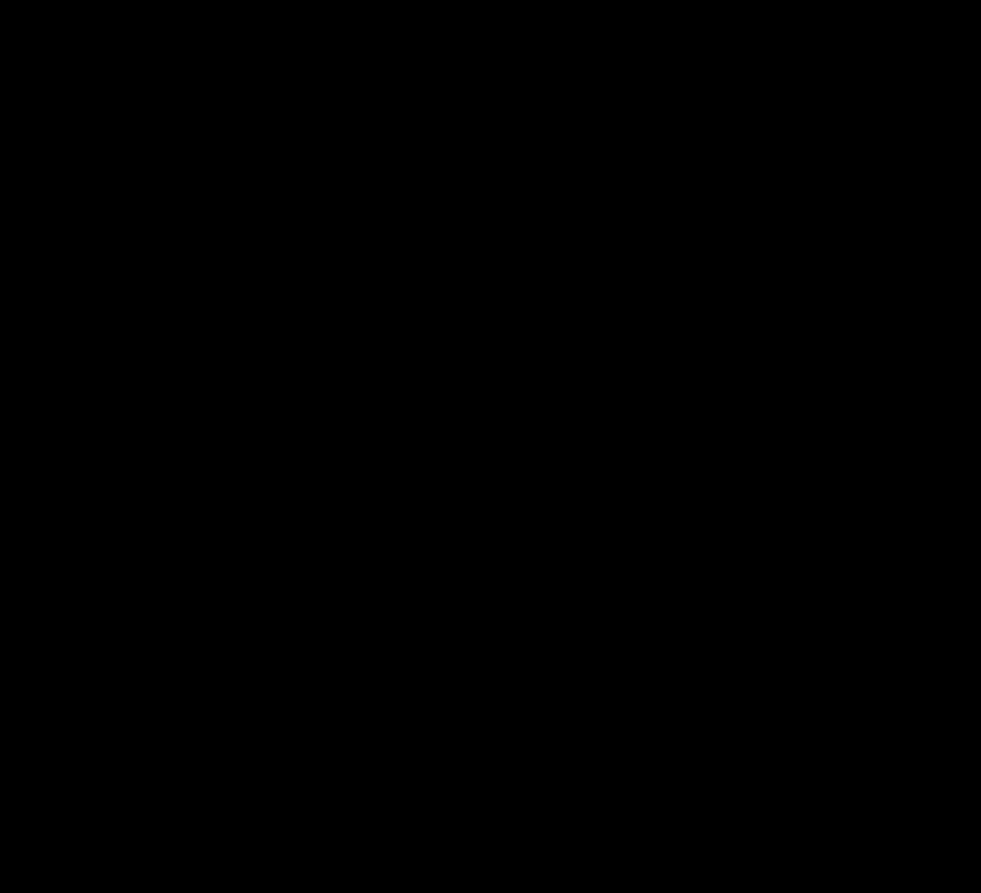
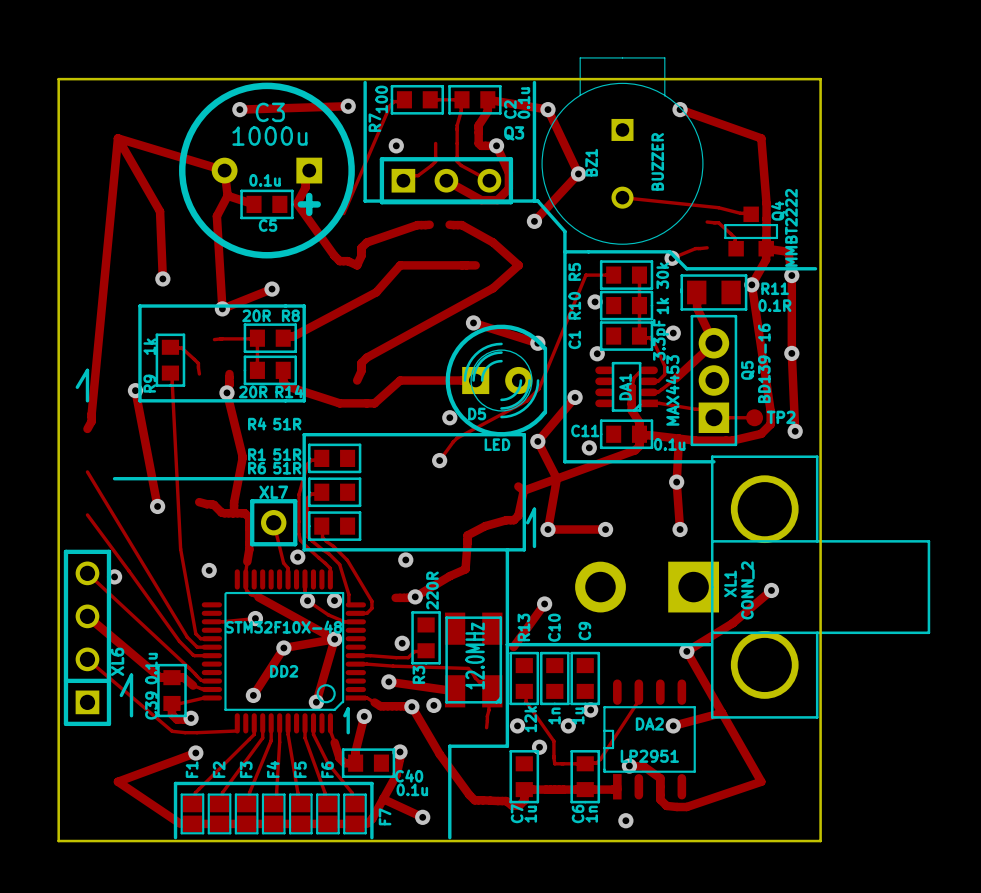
board edge: none -> (58, 79) (820, 79) (820, 841) (58, 841) (58, 79)
line: none -> (365, 82) (365, 201) (537, 201) (564, 231) (564, 461) (713, 461)
line: none -> (534, 82) (534, 201)
track: none -> (404, 99) (394, 101) (390, 105) (343, 213)
R7: none -> 100 (417, 99)
track: none -> (430, 99) (462, 99) (457, 125) (457, 161) (489, 180)
C2: none -> 0.1u (474, 99)
track: none -> (348, 106) (239, 109)
via: none -> (348, 106)
via: none -> (239, 109)
via: none -> (548, 109)
track: none -> (680, 109) (761, 138) (766, 203) (766, 259) (751, 284) (770, 411) (770, 424) (761, 433) (732, 440) (679, 438)
via: none -> (680, 109)
track: none -> (117, 138) (160, 211) (162, 278)
track: none -> (117, 138) (224, 170) (227, 195)
track: none -> (117, 138) (91, 421) (87, 428)
track: none -> (435, 143) (435, 161) (418, 175) (403, 180)
via: none -> (396, 145)
via: none -> (496, 145)
BZ1: none -> BUZZER (622, 151)
C3: none -> 1000u (266, 170)
track: none -> (309, 170) (305, 179) (305, 187) (297, 203) (339, 261) (347, 261) (357, 265) (361, 256) (361, 247) (366, 242) (417, 225) (429, 224)
via: none -> (578, 173)
track: none -> (446, 180) (481, 200) (497, 200) (508, 188) (508, 172) (496, 145) (481, 145) (478, 143) (478, 125) (487, 111) (487, 99) (548, 109) (578, 173) (534, 221)
Q3: none -> (446, 180)
track: none -> (227, 195) (254, 204)
track: none -> (227, 195) (216, 216) (222, 308) (272, 289)
track: none -> (622, 197) (718, 207) (751, 214)
C5: none -> 0.1u (266, 204)
via: none -> (534, 221)
track: none -> (707, 222) (718, 222) (731, 234) (735, 238) (736, 248)
track: none -> (449, 224) (461, 225) (493, 242) (518, 265) (493, 288) (366, 357) (361, 363) (361, 371) (357, 380)
Q4: none -> MMBT2222 (751, 231)
track: none -> (707, 247) (695, 248) (672, 258)
track: none -> (766, 248) (788, 251) (791, 275) (791, 353) (795, 431)
line: none -> (564, 251) (669, 251) (686, 268) (815, 268)
via: none -> (672, 258)
track: none -> (475, 265) (400, 265) (376, 292) (293, 336) (283, 338)
track: none -> (613, 275) (585, 275) (539, 388) (527, 400) (457, 438) (439, 460)
R5: none -> 30k (626, 275)
track: none -> (639, 275) (639, 336) (649, 337) (653, 341) (664, 365) (664, 374) (658, 380) (648, 381)
via: none -> (791, 275)
via: none -> (162, 278)
via: none -> (751, 284)
via: none -> (272, 289)
track: none -> (696, 292) (697, 308) (713, 343) (661, 389) (658, 391) (648, 392)
R11: none -> 0.1R (713, 292)
via: none -> (595, 301)
R10: none -> 1k (626, 305)
line: none -> (139, 306) (304, 306) (304, 400) (139, 400) (139, 306)
via: none -> (222, 308)
track: none -> (473, 322) (537, 343)
via: none -> (473, 322)
via: none -> (673, 333)
C1: none -> 3.3pF (626, 336)
R8: none -> 20R (270, 338)
track: none -> (214, 339) (257, 338) (257, 370)
via: none -> (537, 343)
track: none -> (170, 347) (181, 348) (194, 359) (198, 363) (199, 374)
via: none -> (597, 353)
via: none -> (791, 353)
R9: none -> 1k (170, 360)
R14: none -> 20R (270, 370)
track: none -> (283, 370) (283, 382) (287, 386) (339, 403) (374, 403) (400, 380) (475, 380)
track: none -> (648, 370) (643, 370) (634, 377) (631, 387) (631, 410) (639, 422) (639, 445) (635, 450) (556, 478)
track: none -> (170, 373) (180, 549) (195, 633) (200, 638) (211, 638)
track: none -> (229, 374) (226, 392) (242, 457) (233, 513)
D5: none -> LED (496, 380)
Q5: none -> BD139-16 (713, 380)
DA1: none -> MAX4453 (626, 386)
line: none -> (77, 387) (87, 370) (87, 400)
track: none -> (135, 390) (157, 506)
via: none -> (135, 390)
via: none -> (226, 392)
track: none -> (575, 397) (537, 441) (556, 478)
via: none -> (575, 397)
track: none -> (648, 403) (700, 409) (713, 417) (754, 417)
via: none -> (449, 417)
TP2: none -> (754, 417)
via: none -> (795, 431)
line: none -> (304, 434) (304, 549) (524, 549) (524, 434) (304, 434)
C11: none -> 0.1u (626, 434)
track: none -> (639, 434) (679, 438)
track: none -> (679, 438) (676, 482) (680, 529)
via: none -> (537, 441)
via: none -> (589, 447)
track: none -> (321, 458) (311, 460) (307, 464) (299, 494) (299, 534) (300, 540) (330, 568) (330, 579)
R4: none -> 51R (334, 458)
via: none -> (439, 460)
track: none -> (87, 471) (187, 637) (197, 647) (211, 647)
line: none -> (114, 478) (304, 478)
track: none -> (556, 478) (548, 529) (605, 529)
track: none -> (556, 478) (523, 490)
via: none -> (676, 482)
track: none -> (518, 486) (523, 490)
track: none -> (523, 490) (518, 515) (513, 520) (506, 520) (485, 526) (467, 535) (465, 569) (415, 596) (395, 597)
track: none -> (321, 492) (311, 494) (307, 498) (308, 537) (339, 564) (348, 594) (348, 604) (355, 604)
R1: none -> 51R (334, 492)
track: none -> (199, 502) (213, 504) (221, 512) (244, 513) (249, 517) (246, 590) (251, 594) (334, 639)
via: none -> (157, 506)
track: none -> (87, 514) (179, 641) (193, 655) (211, 655)
track: none -> (273, 522) (283, 562) (288, 568) (288, 579)
XL7: none -> (273, 522)
line: none -> (527, 522) (534, 509) (534, 546)
track: none -> (321, 526) (322, 537) (347, 560) (371, 601) (371, 608) (366, 613) (355, 613)
R6: none -> 51R (334, 526)
via: none -> (548, 529)
via: none -> (605, 529)
via: none -> (680, 529)
line: none -> (507, 549) (507, 746) (449, 746) (449, 837)
via: none -> (297, 557)
via: none -> (405, 559)
via: none -> (209, 570)
track: none -> (87, 573) (201, 680) (211, 681)
via: none -> (114, 576)
track: none -> (304, 579) (307, 600) (328, 615) (344, 621) (355, 621)
XL1: none -> CONN_2 (752, 587)
track: none -> (771, 590) (732, 623) (686, 651) (722, 712)
via: none -> (771, 590)
via: none -> (415, 596)
via: none -> (307, 600)
via: none -> (334, 600)
track: none -> (544, 604) (513, 647)
via: none -> (544, 604)
track: none -> (87, 616) (160, 677) (183, 677) (193, 685) (204, 689) (211, 689)
track: none -> (255, 618) (211, 621)
via: none -> (255, 618)
XL6: none -> (87, 637)
R3: none -> 220R (426, 637)
track: none -> (334, 639) (283, 648) (253, 695)
track: none -> (334, 639) (316, 702)
via: none -> (334, 639)
via: none -> (402, 643)
line: none -> (507, 644) (710, 644)
via: none -> (283, 648)
track: none -> (426, 650) (414, 651) (408, 657) (355, 655)
DD2: none -> STM32F10X-48 (283, 651)
via: none -> (686, 651)
track: none -> (87, 659) (172, 731) (197, 732) (237, 730) (237, 723)
part: none -> 12.0MHz (473, 659)
track: none -> (355, 664) (468, 668) (479, 681) (483, 681) (492, 691) (486, 727)
R13: none -> 12k (524, 678)
C10: none -> 1n (554, 678)
C9: none -> 1u (585, 678)
track: none -> (388, 681) (455, 691)
via: none -> (388, 681)
C39: none -> 0.1u (171, 690)
track: none -> (524, 691) (526, 701) (553, 741) (554, 763) (596, 763) (638, 700) (638, 692)
line: none -> (121, 695) (131, 675) (131, 715)
via: none -> (253, 695)
track: none -> (211, 697) (171, 703) (171, 714) (177, 719) (191, 718)
track: none -> (355, 697) (367, 697) (380, 706) (411, 706) (439, 754) (474, 800) (506, 801) (512, 805) (519, 805) (524, 800) (524, 789) (617, 789) (617, 786)
via: none -> (316, 702)
via: none -> (433, 705)
via: none -> (411, 706)
via: none -> (590, 709)
track: none -> (722, 712) (761, 781) (686, 807) (666, 805) (660, 799) (660, 778) (643, 766) (629, 766)
track: none -> (722, 712) (673, 725)
line: none -> (344, 715) (348, 708) (348, 732)
track: none -> (364, 716) (355, 751) (355, 763) (344, 763) (339, 758) (330, 730) (330, 723)
via: none -> (364, 716)
via: none -> (191, 718)
track: none -> (254, 723) (254, 734) (195, 792) (192, 803)
track: none -> (262, 723) (262, 737) (222, 792) (219, 803)
track: none -> (271, 723) (271, 740) (246, 803)
track: none -> (279, 723) (276, 797) (273, 803)
track: none -> (288, 723) (297, 797) (300, 803)
track: none -> (305, 723) (305, 737) (327, 803)
track: none -> (313, 723) (313, 734) (327, 762) (352, 792) (354, 803)
via: none -> (517, 725)
via: none -> (568, 725)
via: none -> (673, 725)
DA2: none -> LP2951 (649, 739)
via: none -> (539, 747)
track: none -> (400, 751) (396, 774) (383, 799)
via: none -> (400, 751)
track: none -> (195, 752) (117, 781) (179, 823) (367, 823) (383, 799)
via: none -> (195, 752)
C40: none -> 0.1u (368, 763)
via: none -> (629, 766)
C7: none -> 1u (524, 776)
C6: none -> 1n (585, 776)
track: none -> (383, 799) (422, 817)
F1: none -> (192, 813)
F2: none -> (219, 813)
F3: none -> (246, 813)
F4: none -> (273, 813)
F5: none -> (300, 813)
F6: none -> (327, 813)
F7: none -> (354, 813)
via: none -> (422, 817)
via: none -> (625, 820)
line: none -> (175, 837) (175, 783) (371, 783) (371, 837)

